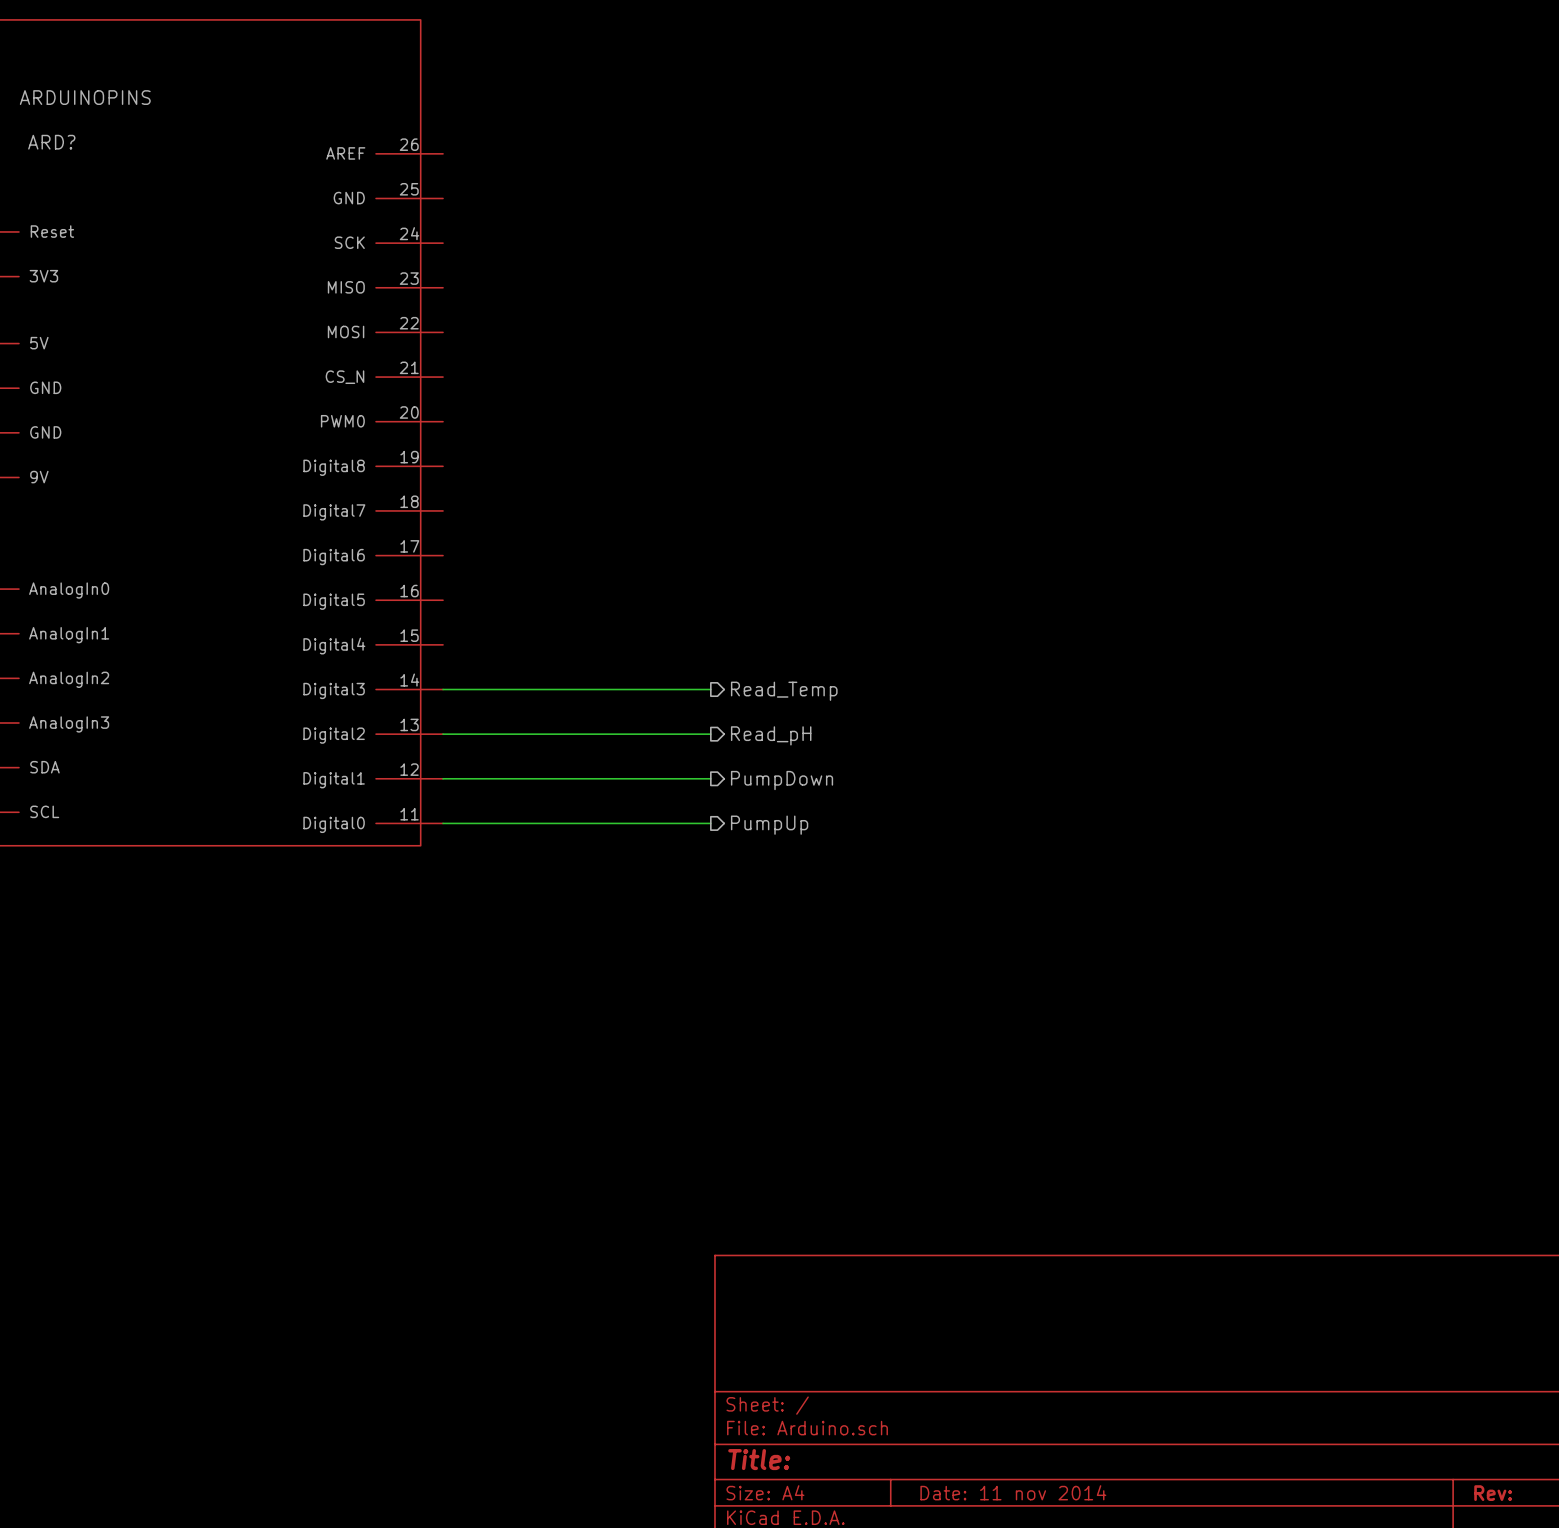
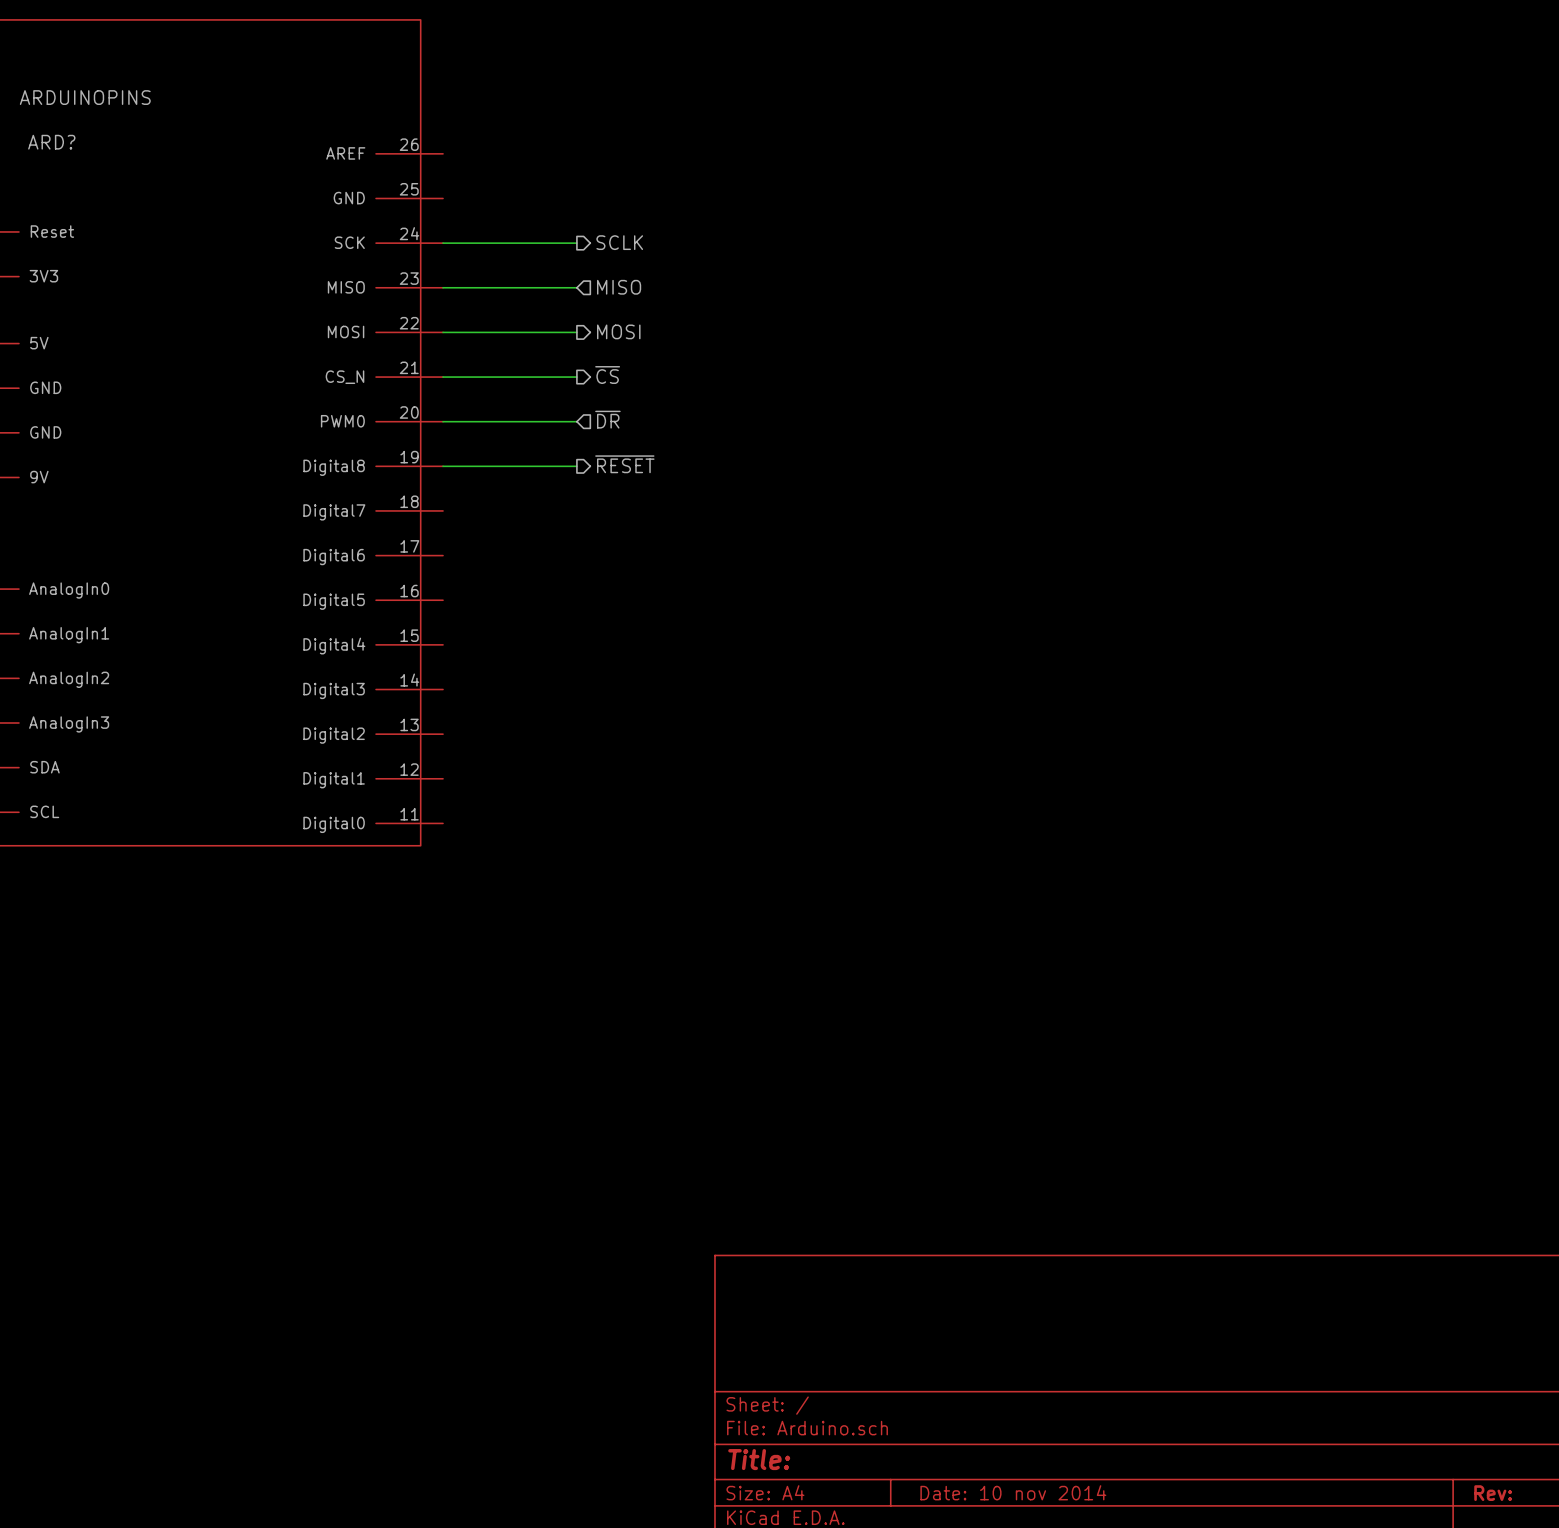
hierarchical label: none -> SCLK (619, 242)
wire: none -> (443, 243) (576, 243)
wire: none -> (443, 287) (576, 287)
hierarchical label: none -> MISO (619, 287)
hierarchical label: none -> MOSI (618, 331)
wire: none -> (443, 332) (576, 332)
hierarchical label: none -> ~{CS} (607, 375)
wire: none -> (443, 377) (576, 377)
hierarchical label: none -> ~{DR} (607, 419)
wire: none -> (443, 421) (576, 421)
hierarchical label: none -> ~{RESET} (624, 464)
wire: none -> (443, 466) (576, 466)
wire: (443, 689) (710, 689) -> none
hierarchical label: Read_Temp (784, 691) -> none
wire: (443, 734) (710, 734) -> none
hierarchical label: Read_pH (771, 735) -> none
wire: (443, 778) (710, 778) -> none
hierarchical label: PumpDown (782, 780) -> none
wire: (443, 823) (710, 823) -> none
hierarchical label: PumpUp (769, 825) -> none
title block: Date: 11 nov 2014 (1013, 1492) -> Date: 10 nov 2014 (1013, 1492)

